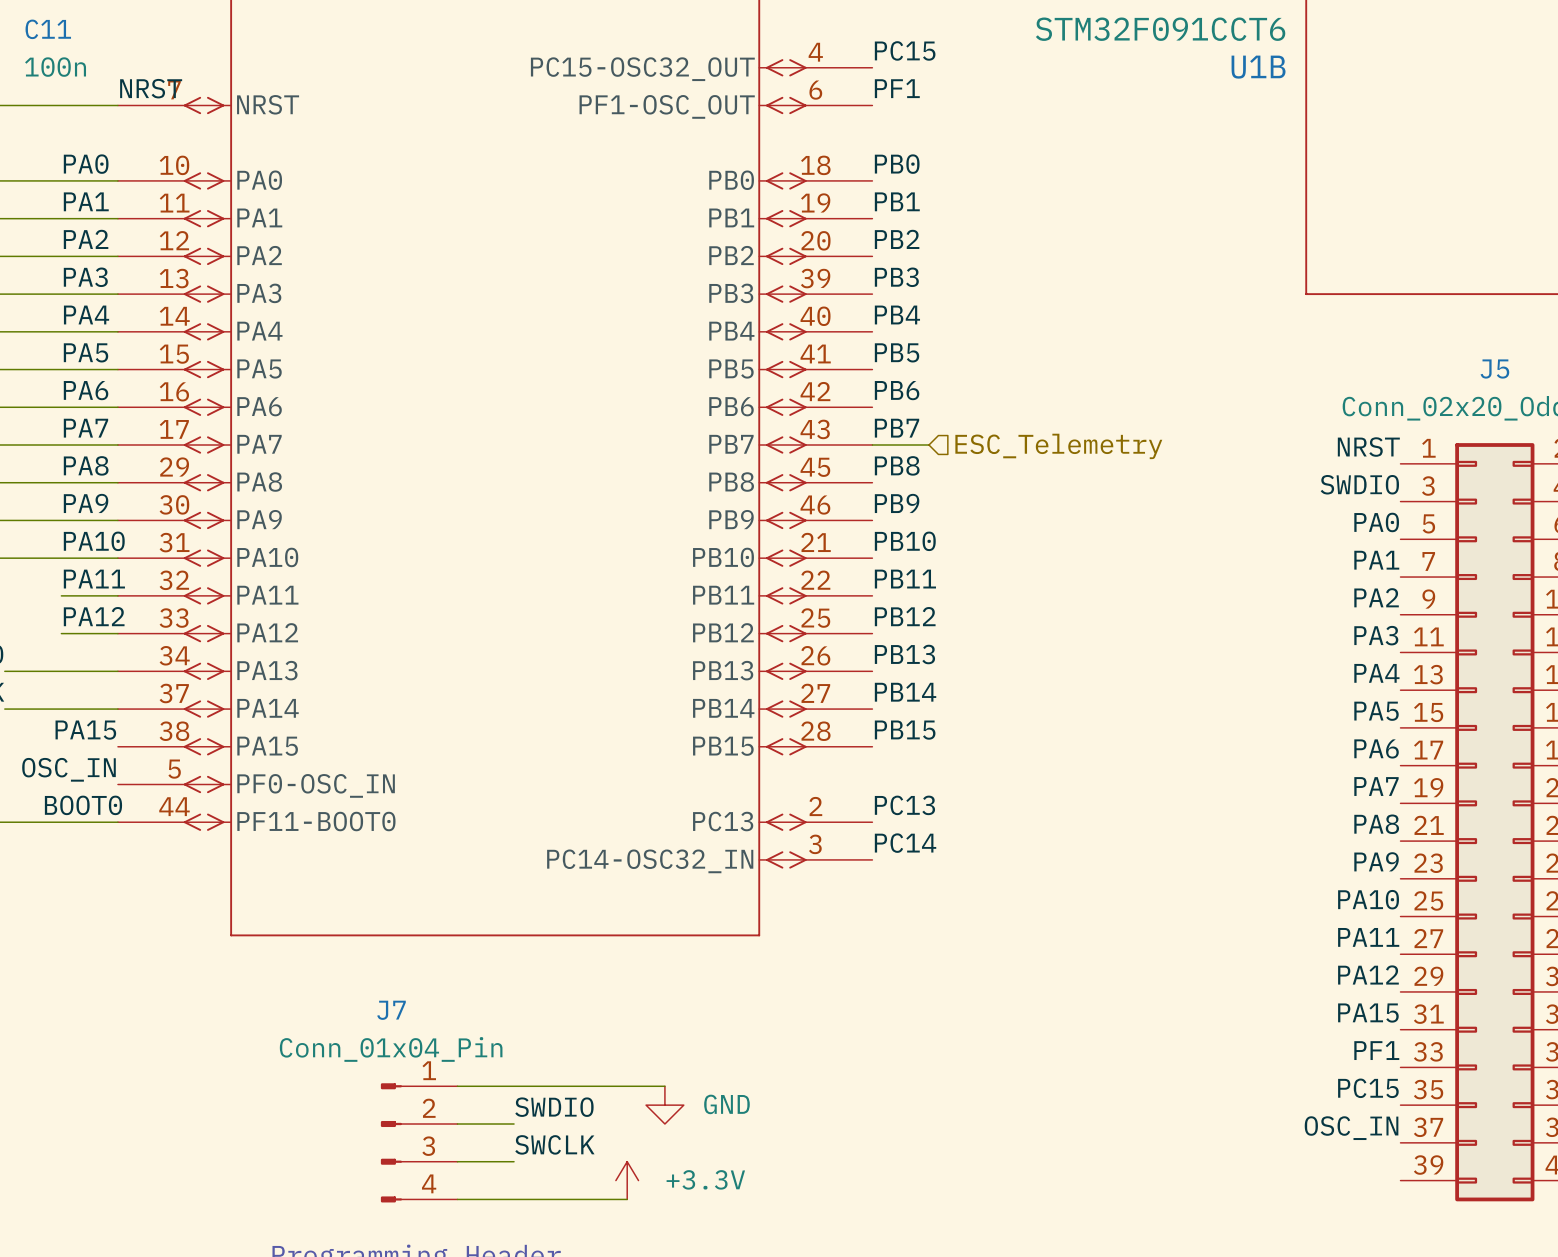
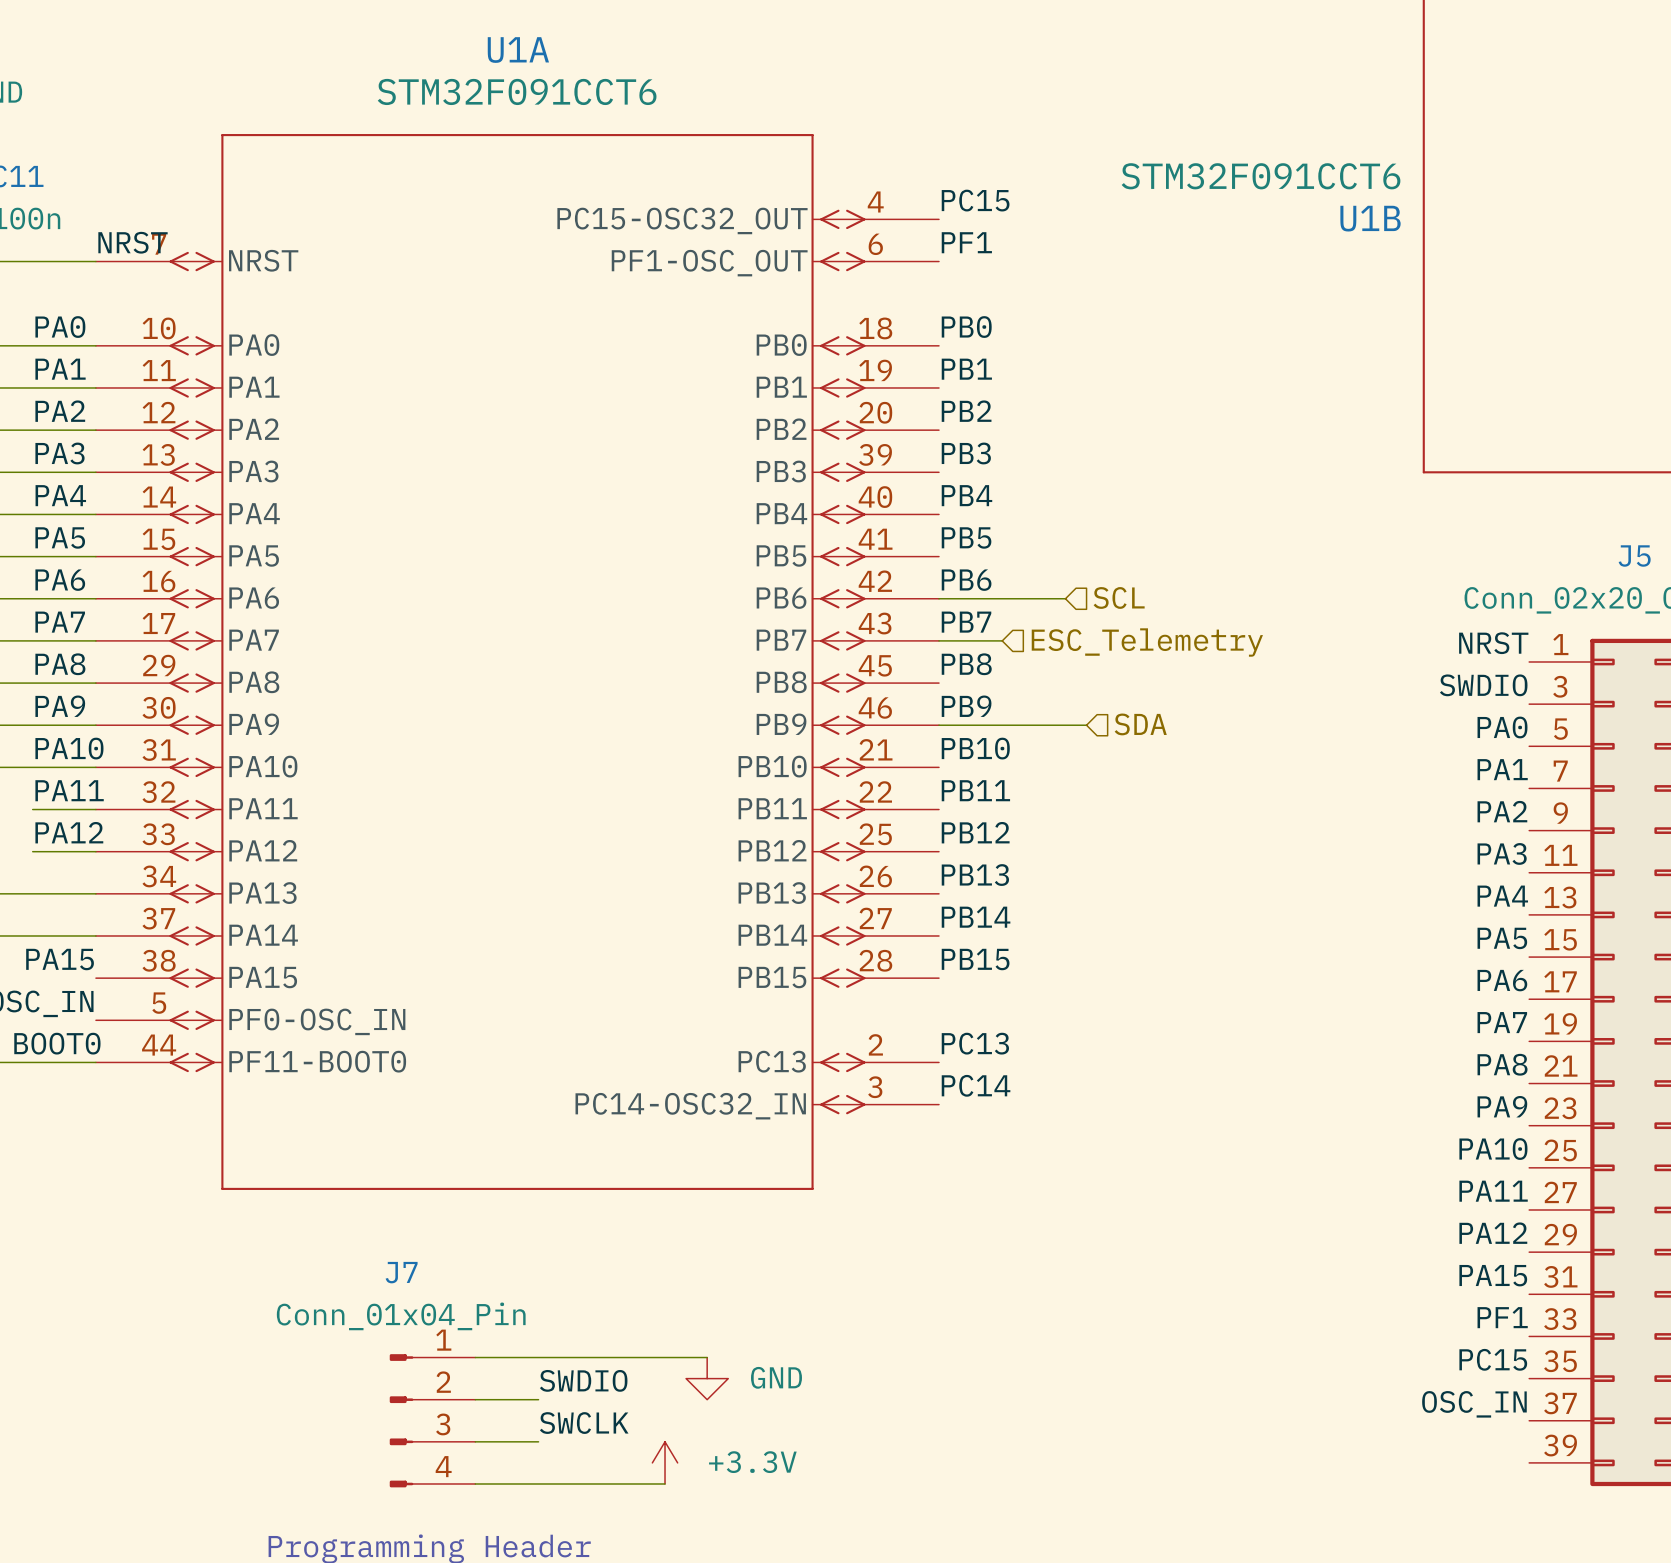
hierarchical label: none -> SCL (1119, 597)
wire: none -> (939, 598) (1065, 598)
hierarchical label: none -> SDA (1140, 724)
wire: none -> (939, 725) (1086, 725)

